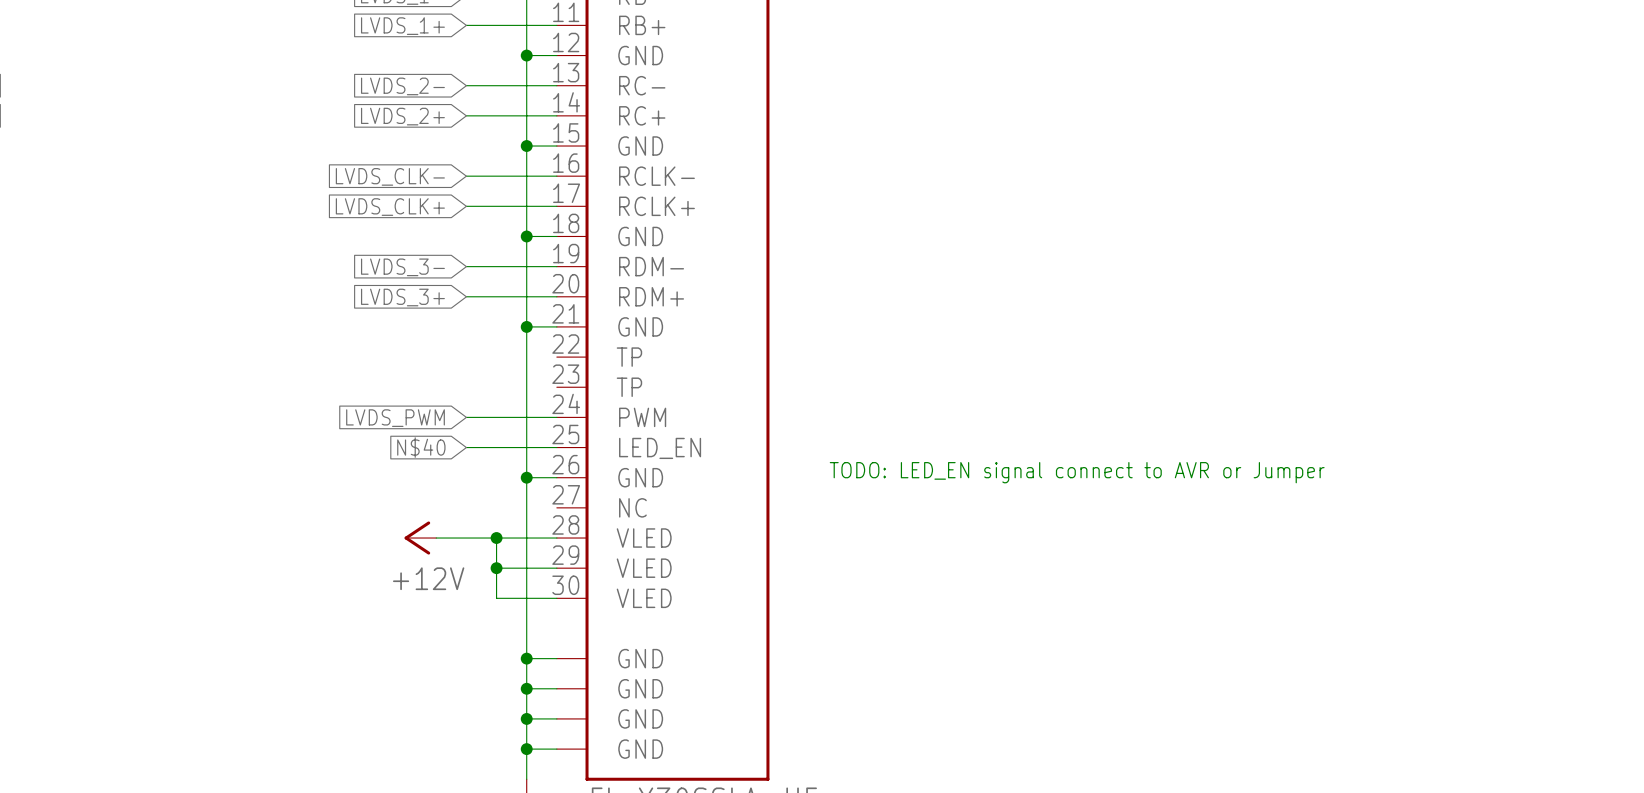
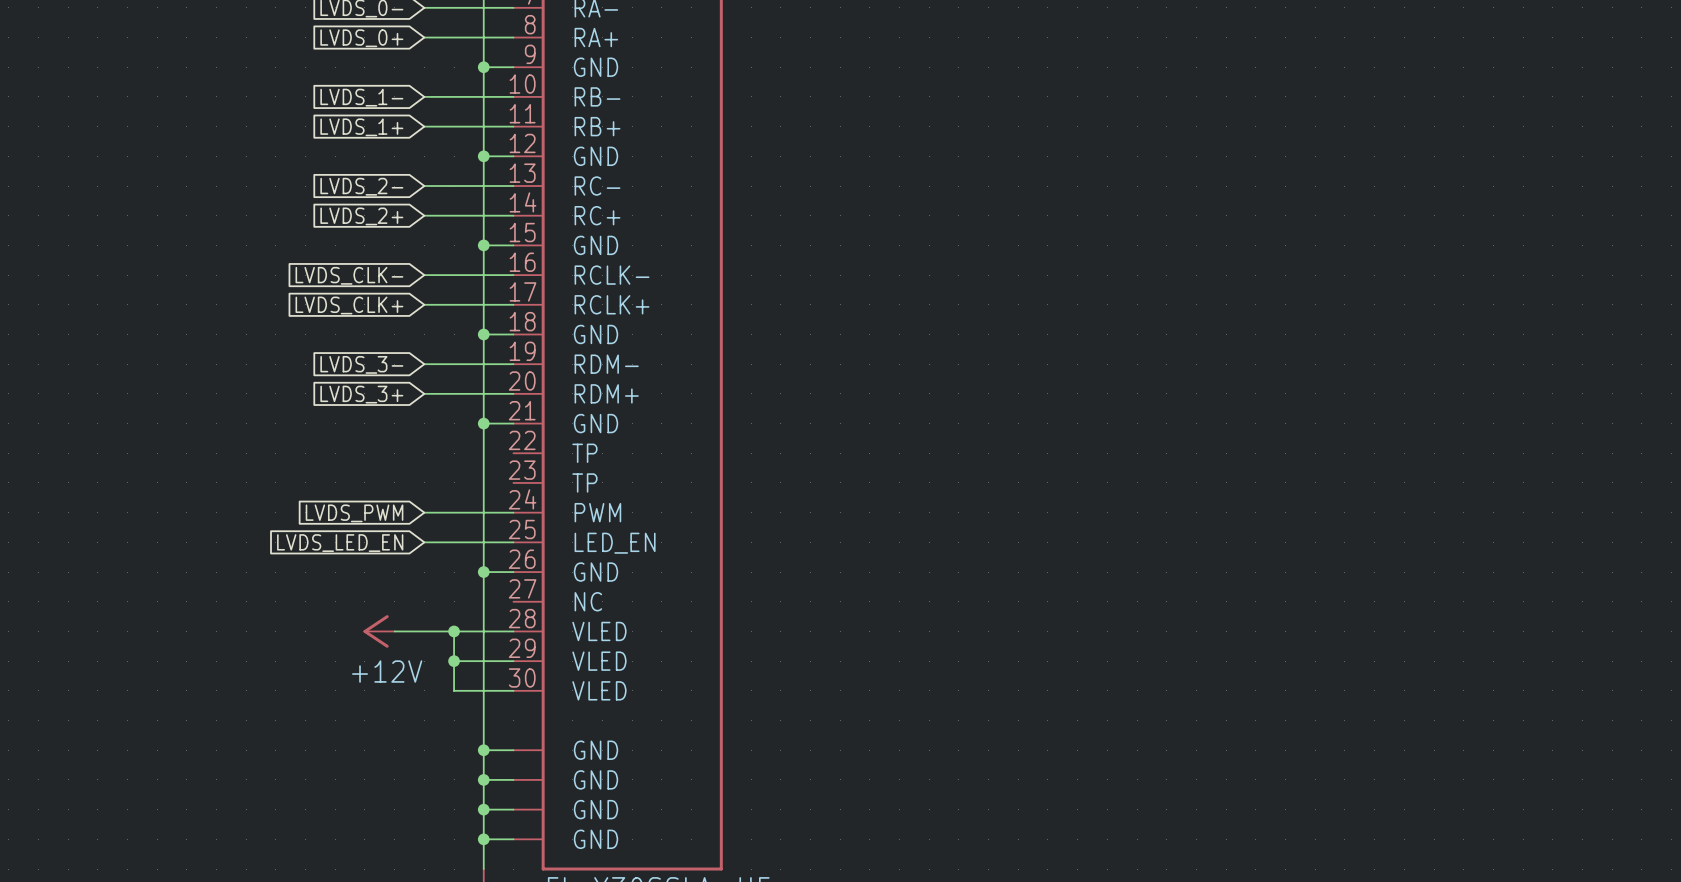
global label: N$40 (421, 447) -> LVDS_LED_EN (340, 543)
text: TODO: LED_EN signal connect to AVR or Jumper (1077, 472) -> none

